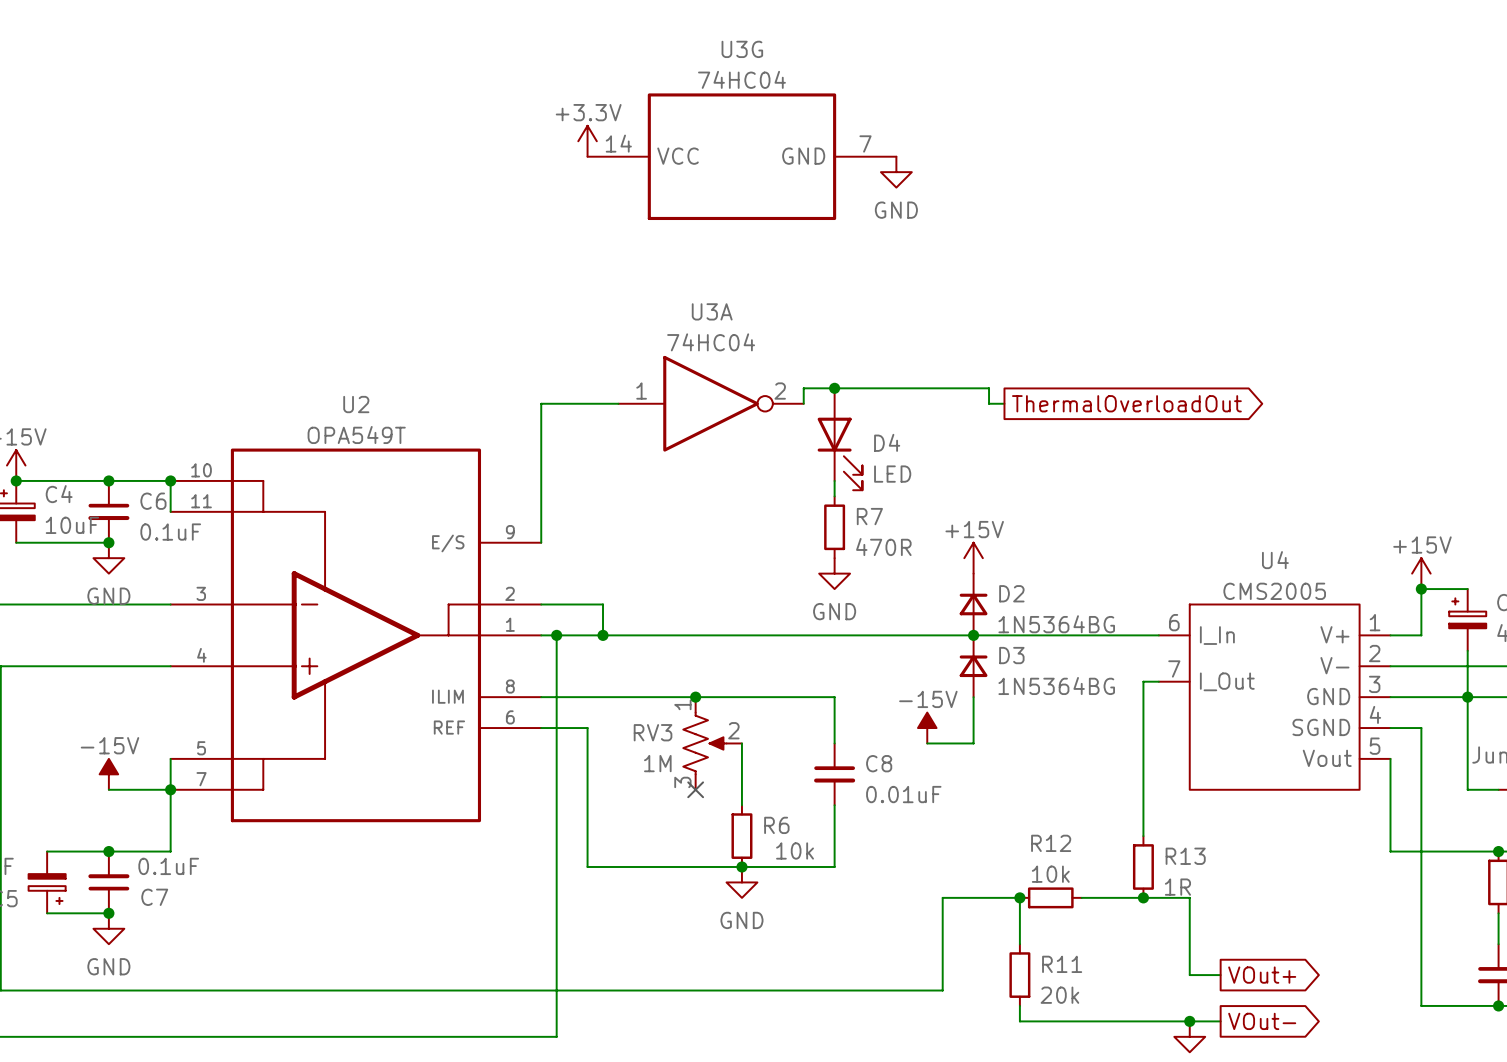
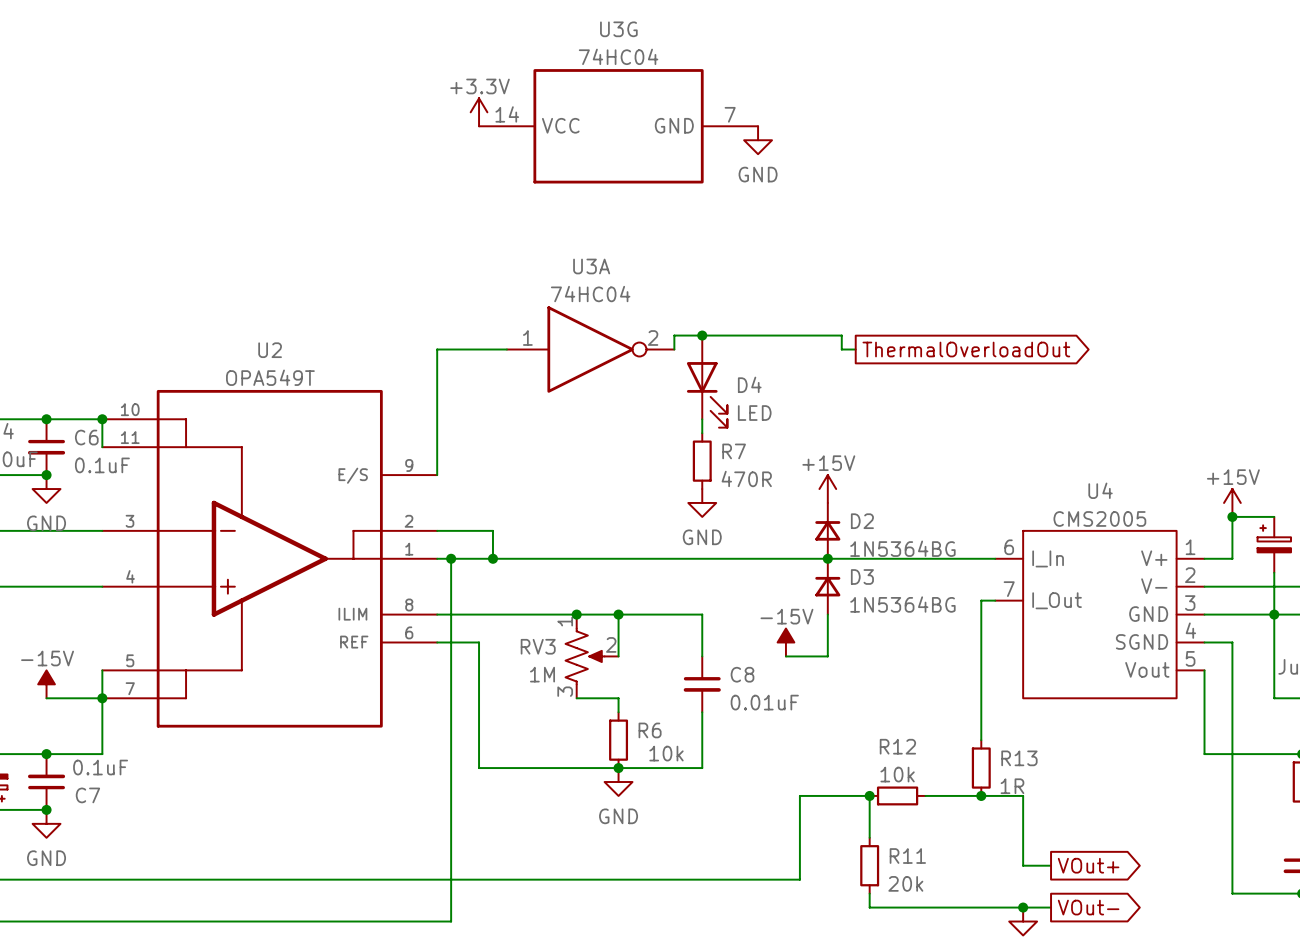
wire: none -> (618, 614) (618, 656)
junction: none -> (618, 614)
wire: (741, 743) (741, 789) -> (576, 698) (618, 698)
no-connect mark: (695, 789) -> none

